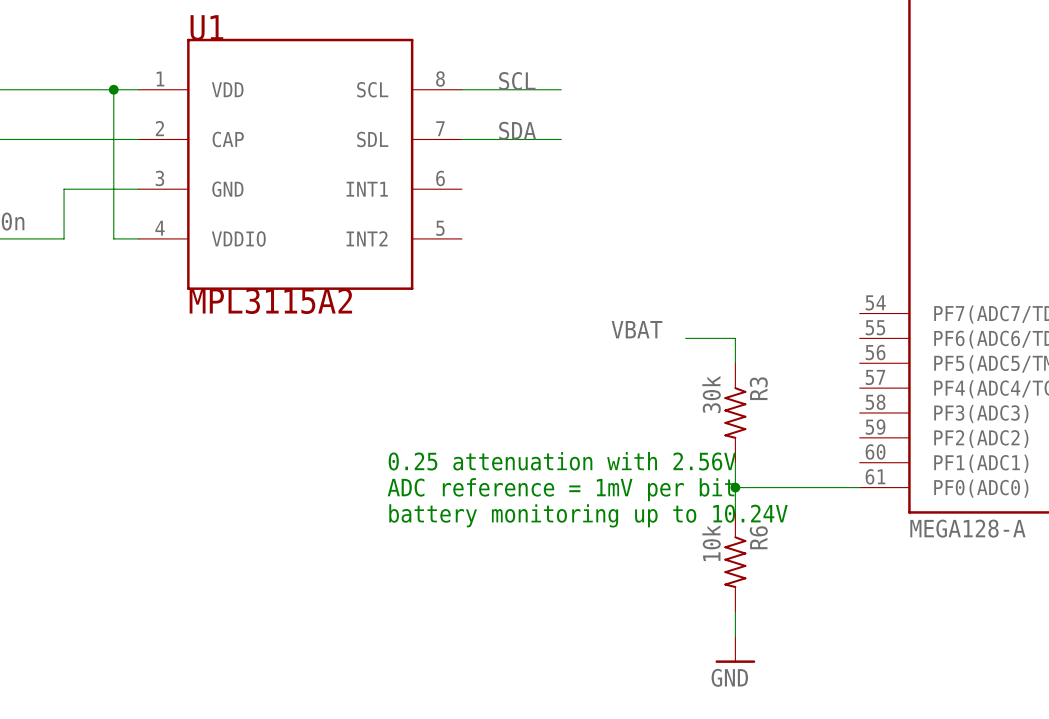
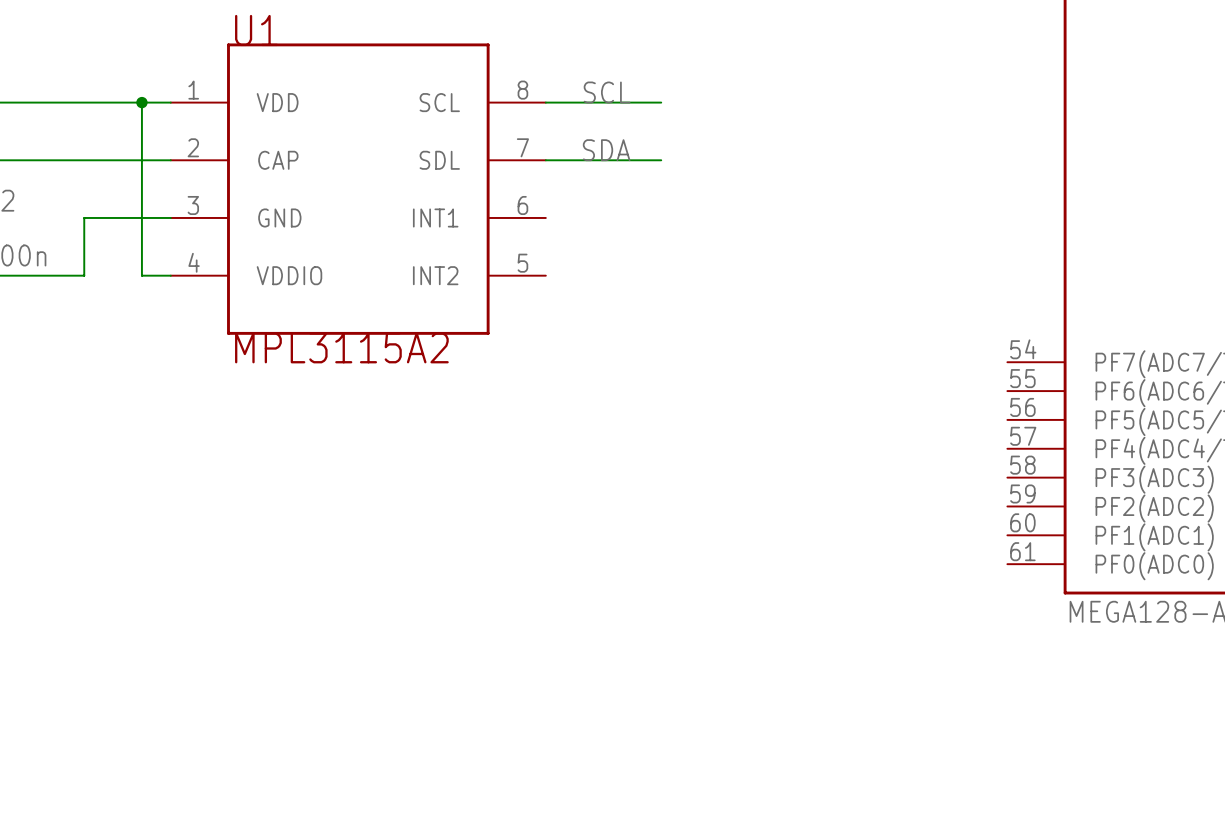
label: VBAT (636, 329) -> none
wire: (685, 338) (735, 338) (735, 363) -> none
R3: 30k (735, 412) -> none
text: 0.25 attenuation with 2.56V (562, 461) -> none
wire: (735, 462) (735, 512) -> none
wire: (735, 487) (859, 487) -> none
junction: (735, 487) -> none
text: ADC reference = 1mV per bit (561, 489) -> none
text: battery monitoring up to 10.24V (588, 515) -> none
R6: 10k (735, 562) -> none
wire: (735, 611) (735, 636) -> none
power symbol: GND (735, 649) -> none

